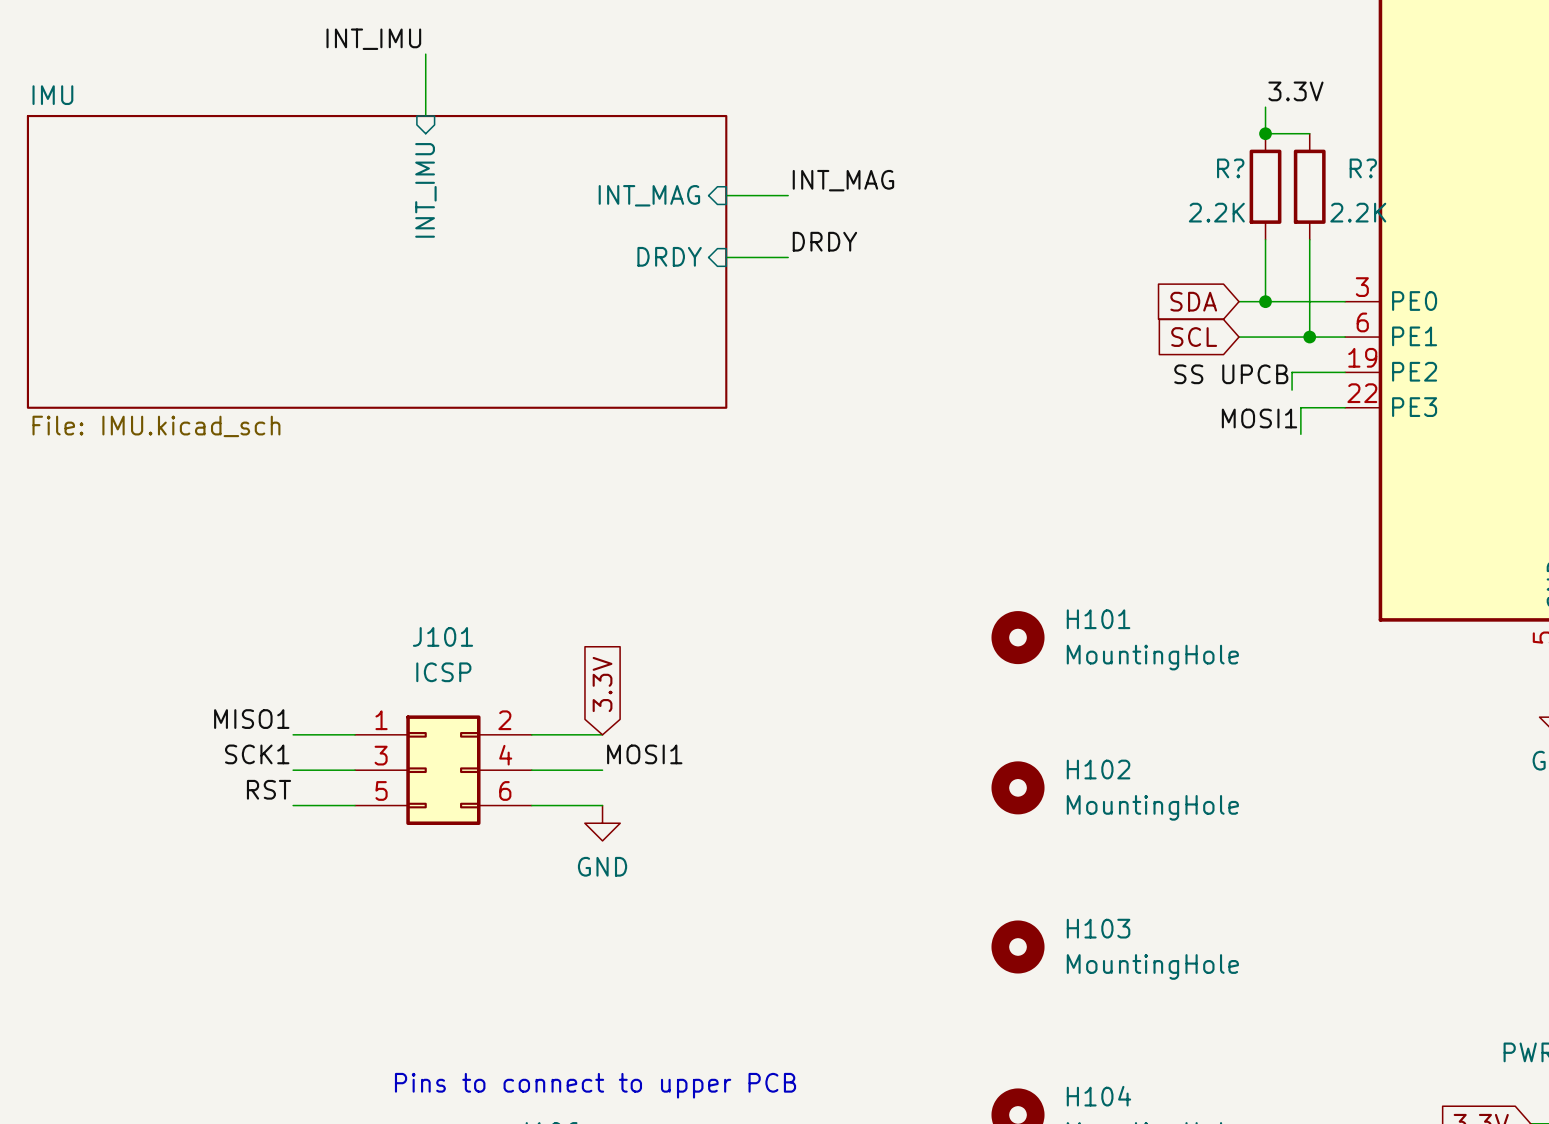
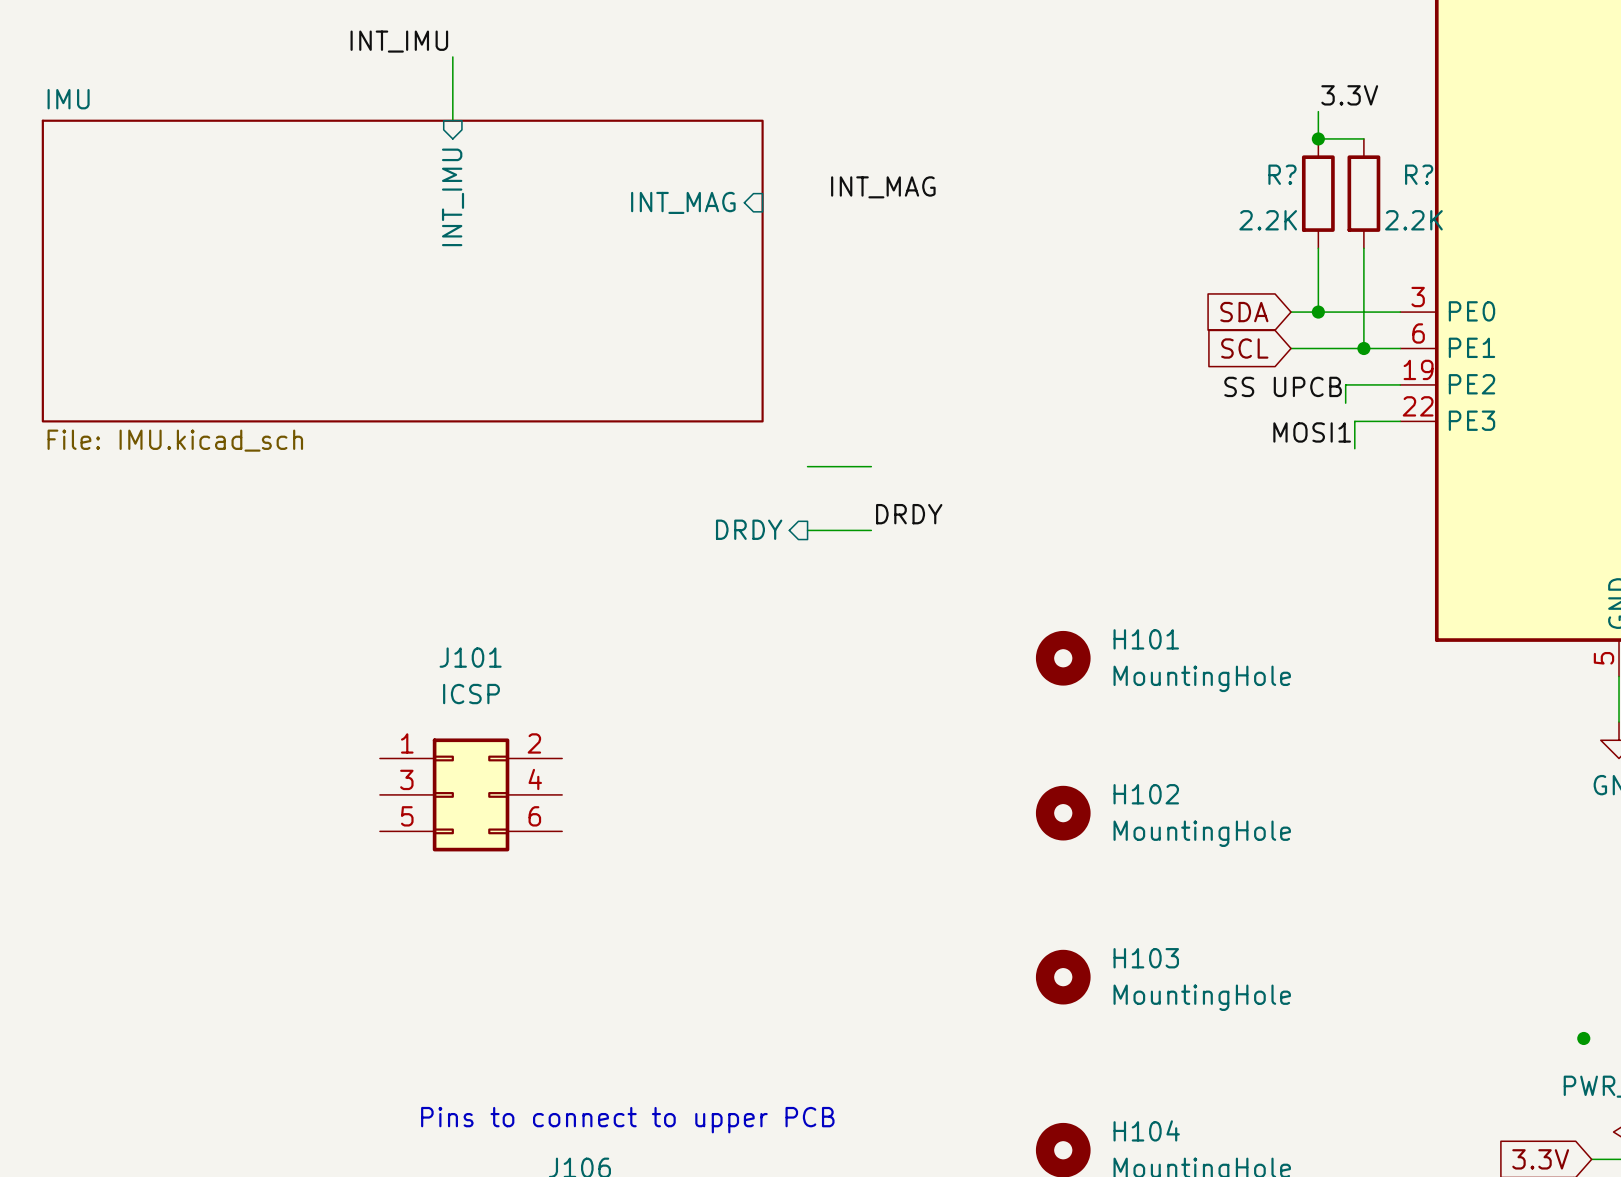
wire: (726, 195) (788, 195) -> (807, 466) (871, 466)
label position: DRDY (824, 241) -> DRDY (909, 514)
sheet pin position: DRDY (669, 256) -> DRDY (749, 529)
wire: (726, 257) (788, 257) -> (807, 530) (871, 530)
global label: 3.3V (602, 684) -> none
label: MISO1 (251, 719) -> none
wire: (293, 734) (355, 734) -> none
wire: (531, 734) (602, 734) -> none
label: SCK1 (257, 754) -> none
label: MOSI1 (644, 754) -> none
wire: (293, 770) (355, 770) -> none
wire: (531, 770) (602, 770) -> none
label: RST (269, 789) -> none
wire: (293, 805) (355, 805) -> none
wire: (531, 805) (602, 805) -> none
power symbol: GND (602, 823) -> none
junction: none -> (1583, 1038)

